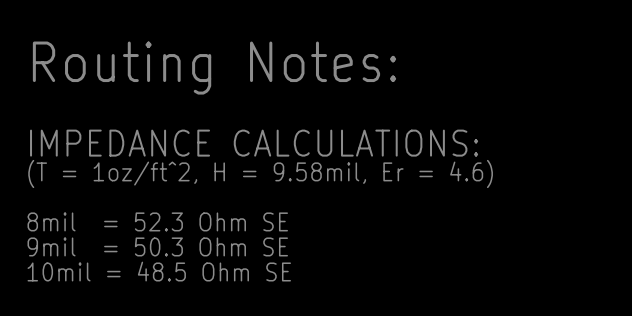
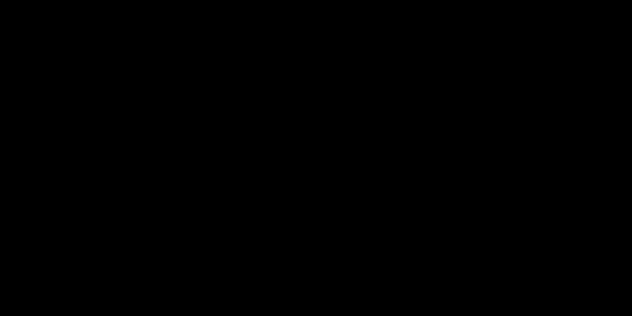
text: Routing Notes: (214, 68) -> none
text: IMPEDANCE CALCULATIONS: (254, 143) -> none
text: (T = 1oz/ft^2, H = 9.58mil, Er = 4.6) (260, 173) -> none
text: 8mil = 52.3 Ohm SE (157, 221) -> none
text: 9mil = 50.3 Ohm SE (157, 246) -> none
text: 10mil = 48.5 Ohm SE (159, 271) -> none

